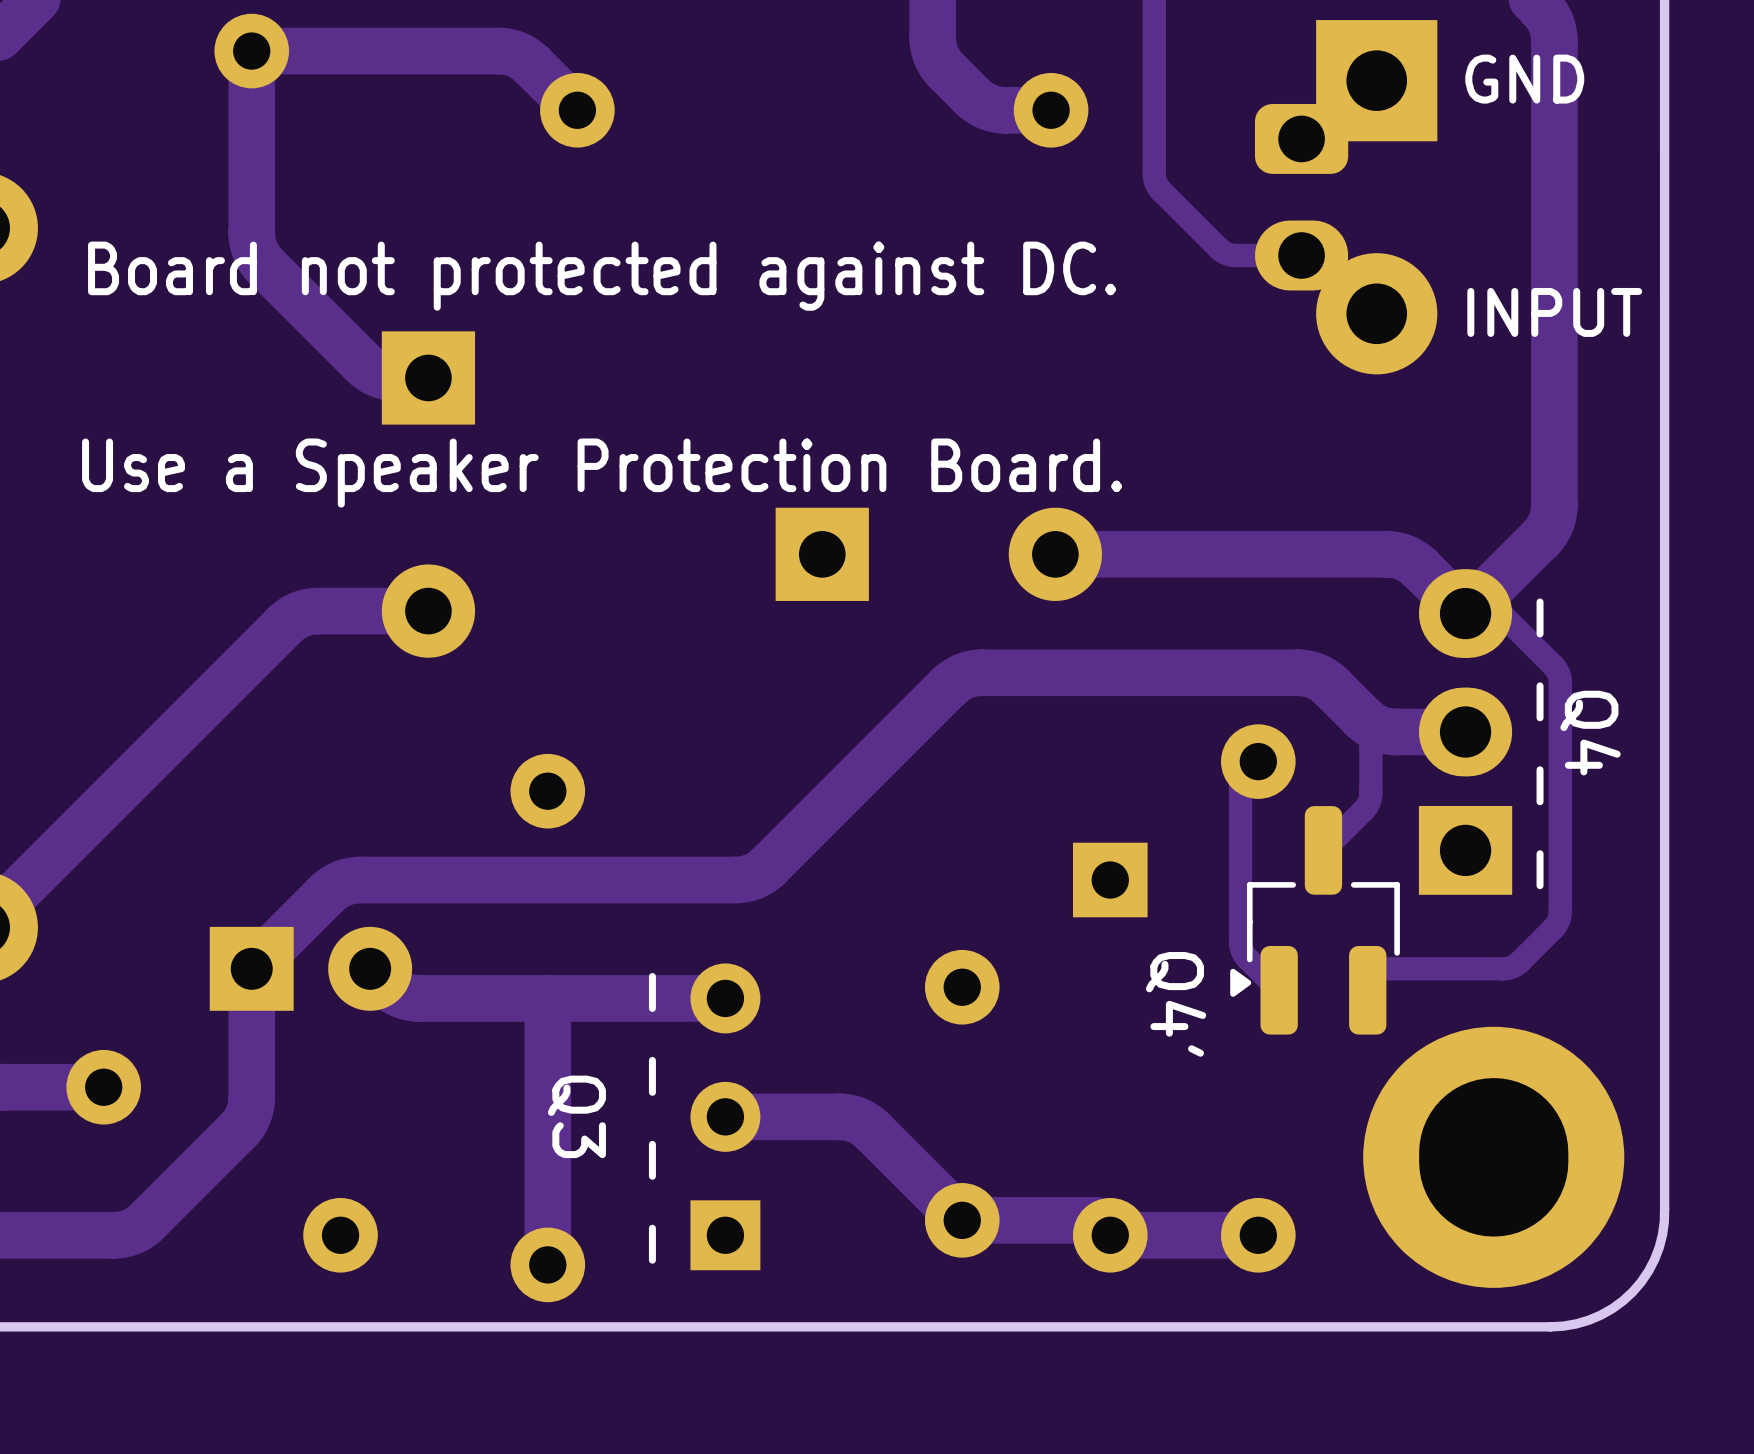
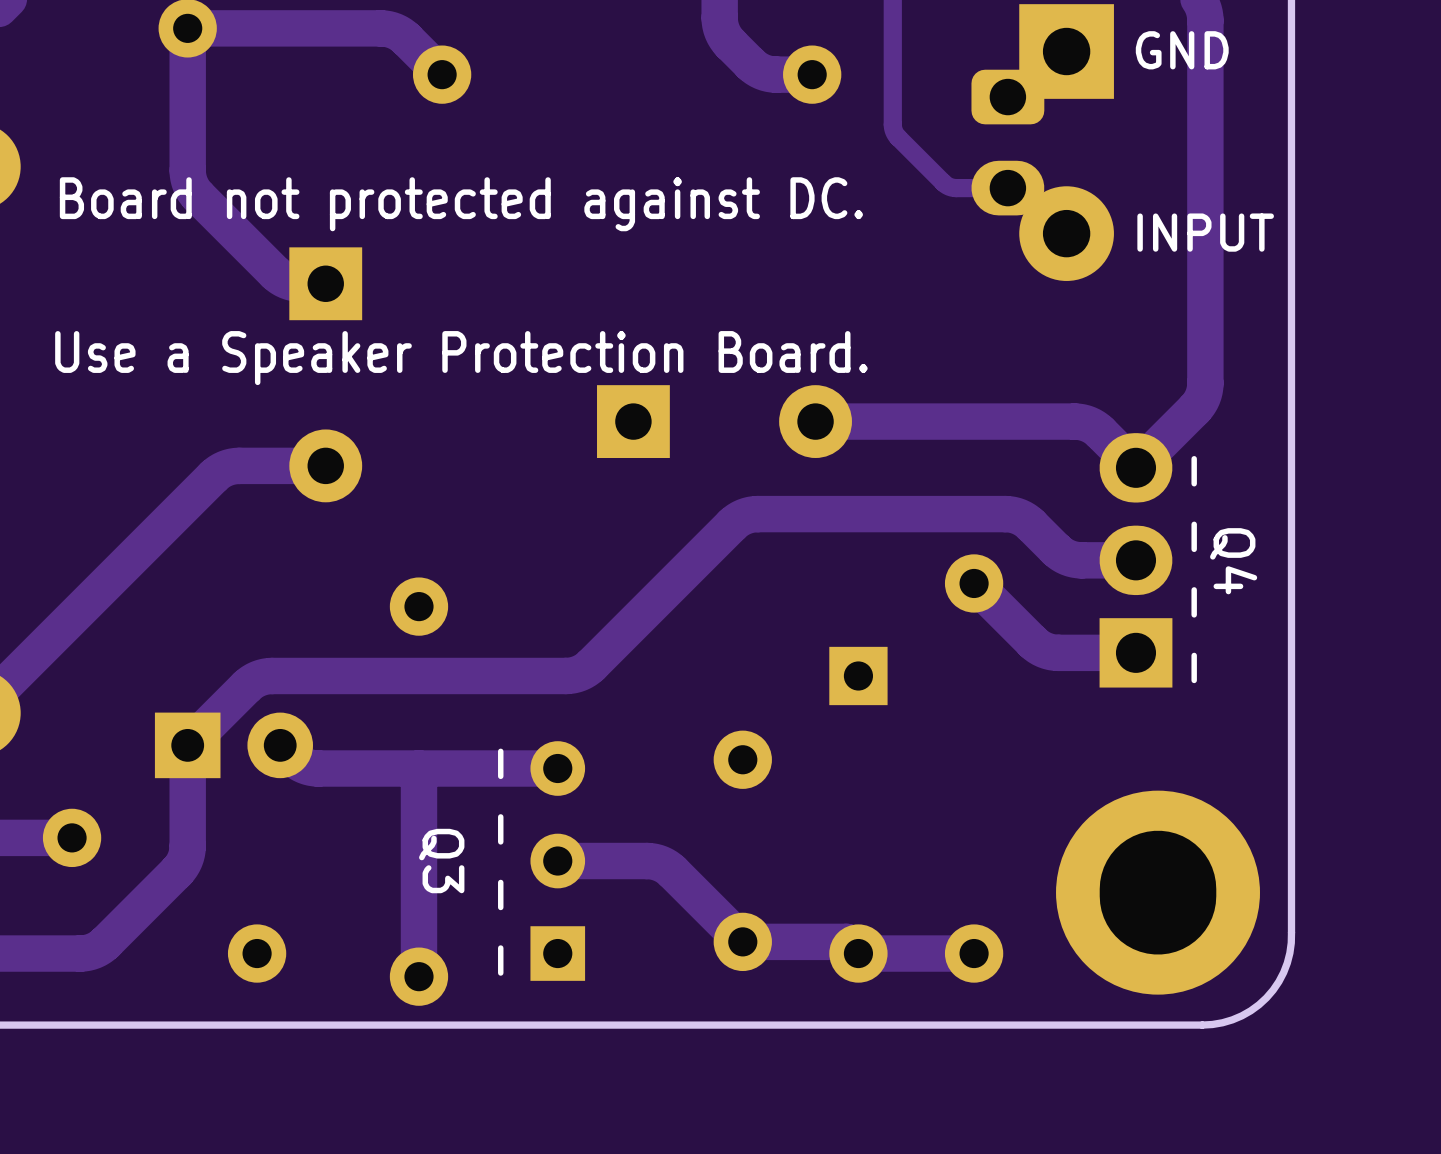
track: (1465, 613) (1501, 613) (1553, 665) (1559, 675) (1559, 917) (1553, 928) (1519, 962) (1510, 967) (1370, 968) -> none
track: (1370, 726) (1370, 793) (1369, 802) (1363, 809) (1323, 850) -> none
track: none -> (974, 583) (1032, 642) (1044, 650) (1058, 652) (1135, 652)
track: (1247, 772) (1242, 780) (1240, 789) (1240, 945) (1245, 956) (1279, 990) -> none
Q4': (1315, 920) -> none

